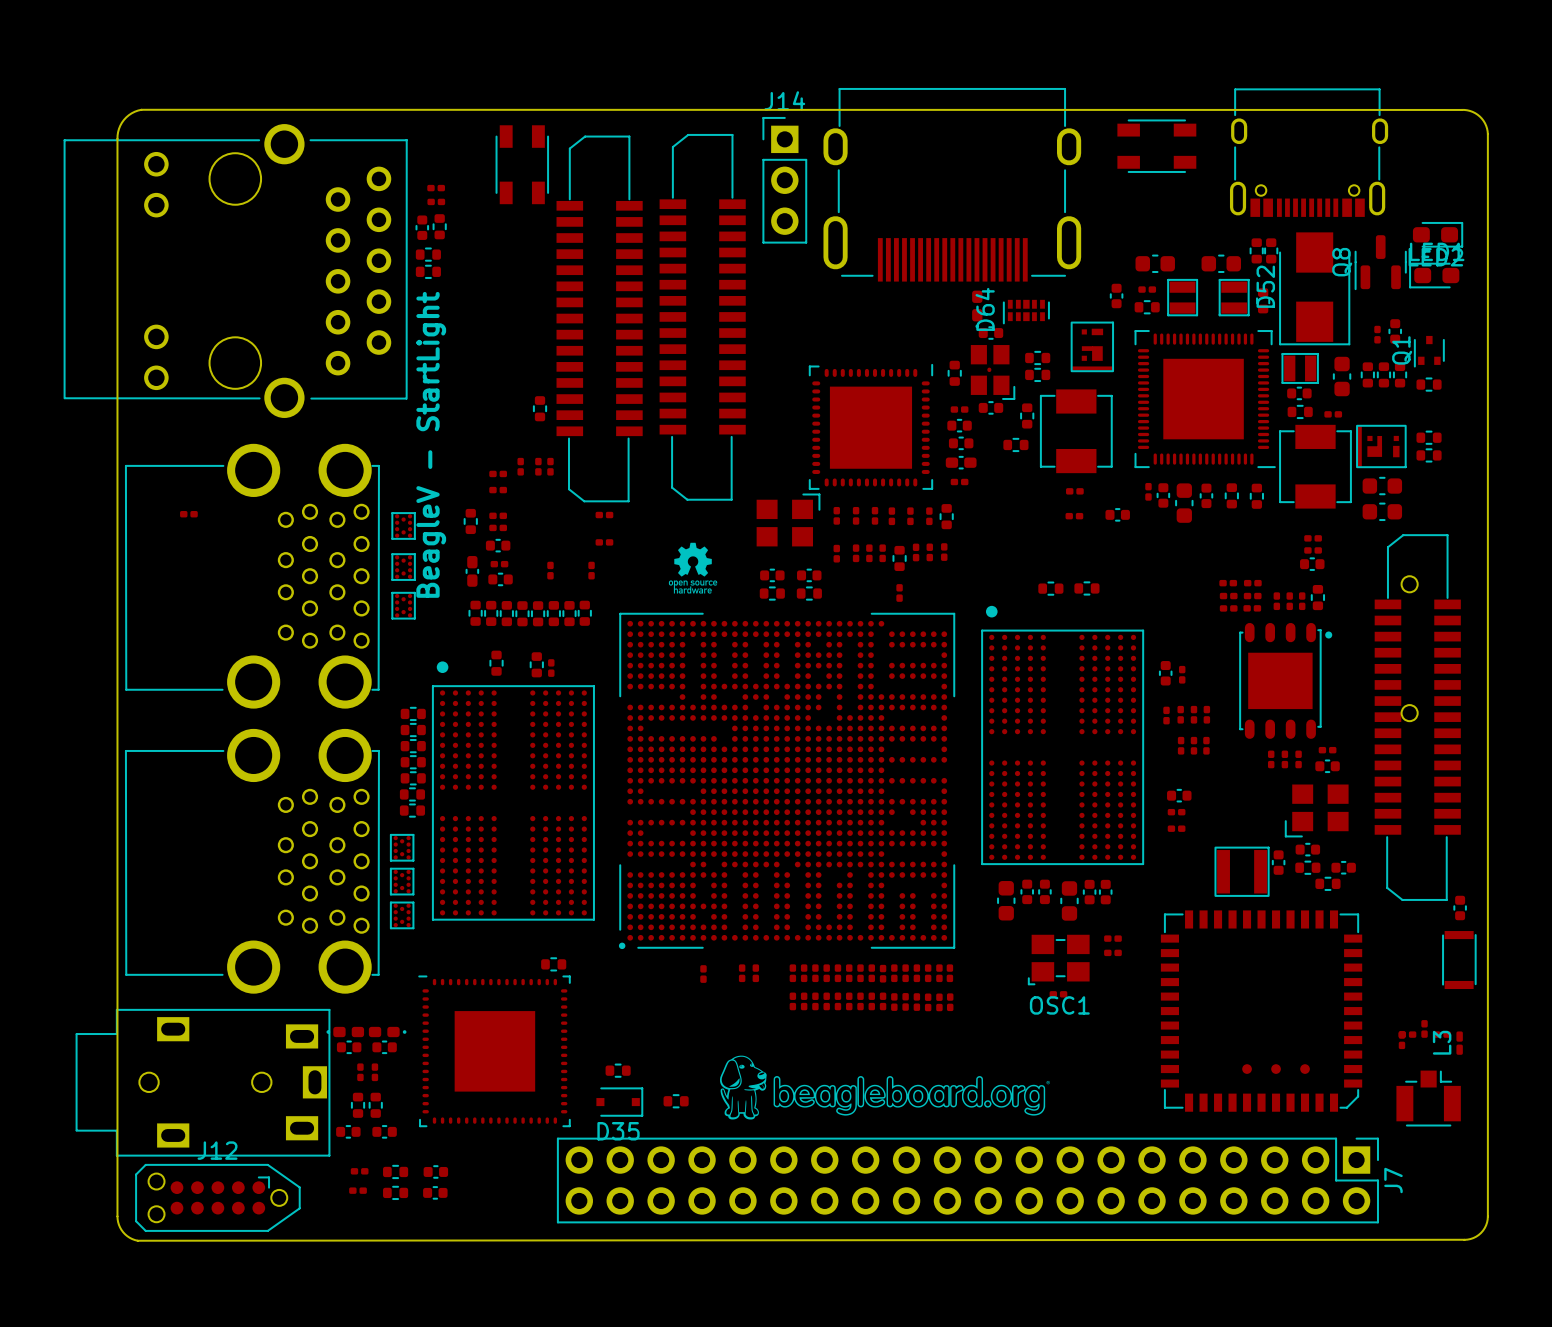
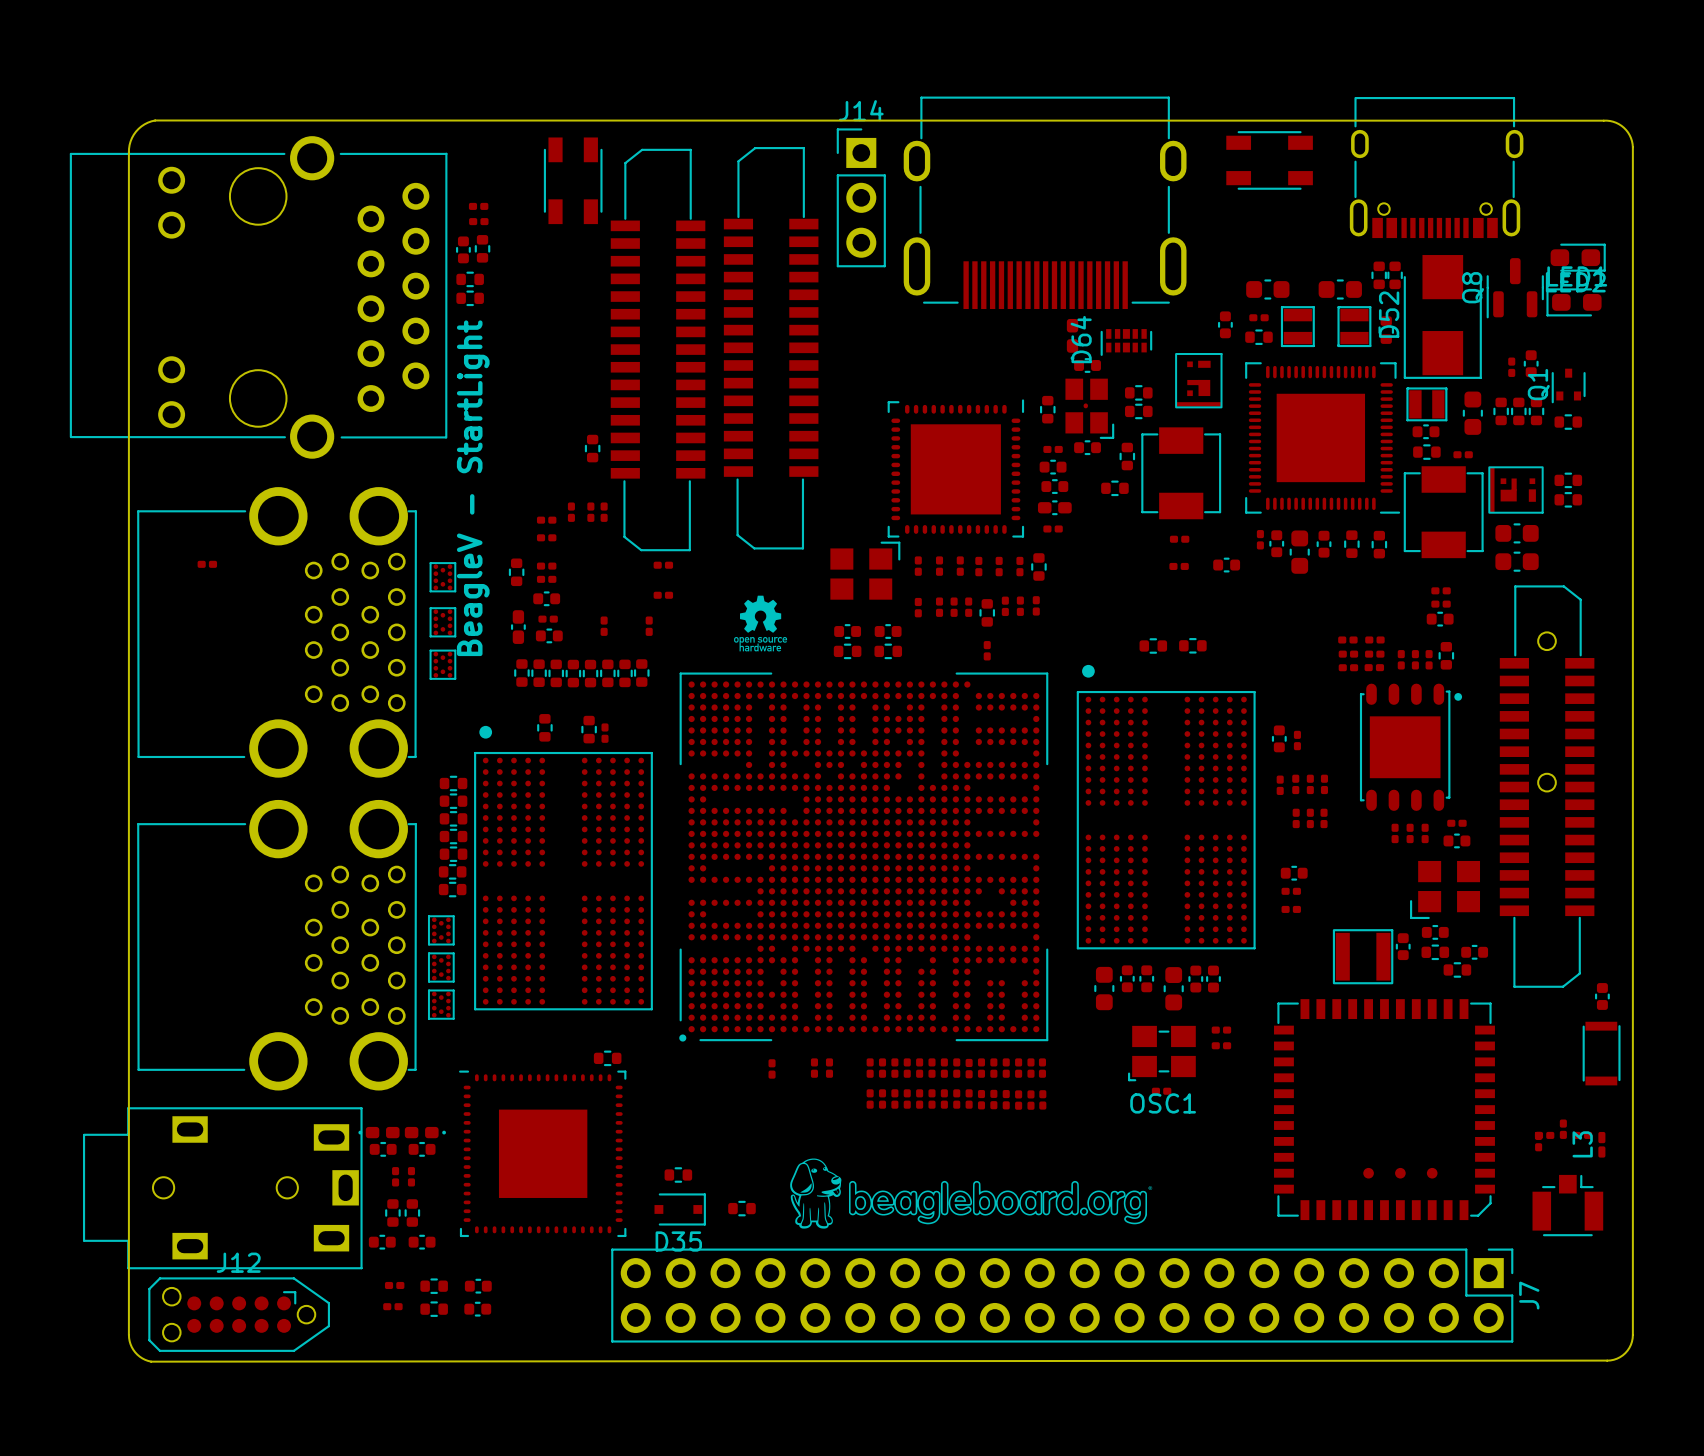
part rotation: 0° (1417, 717) -> 180° (1547, 786)

